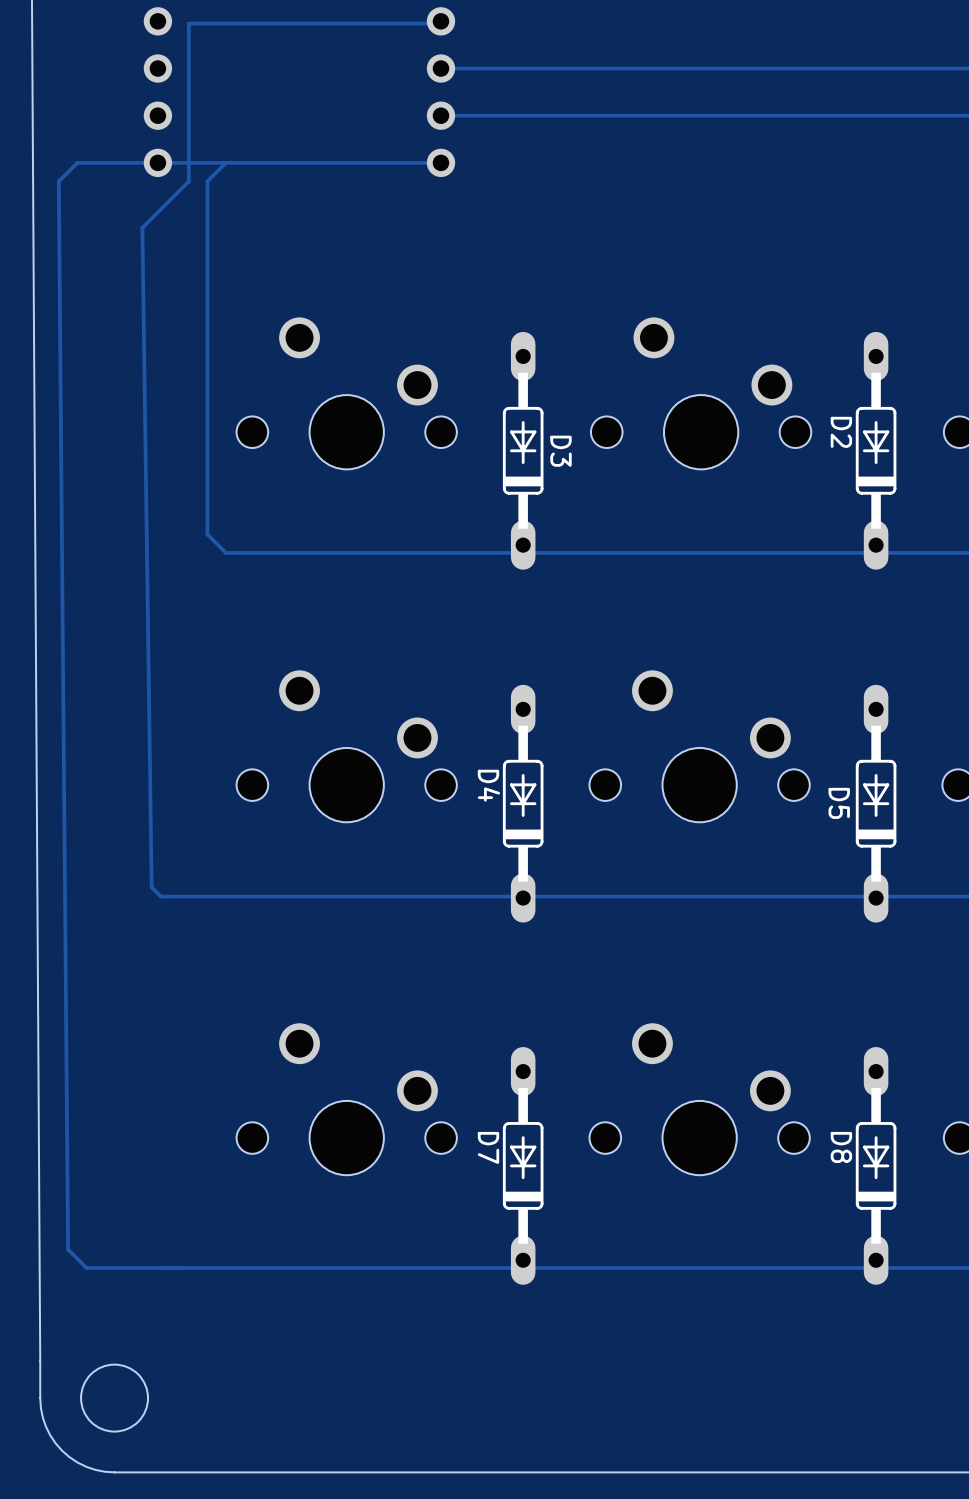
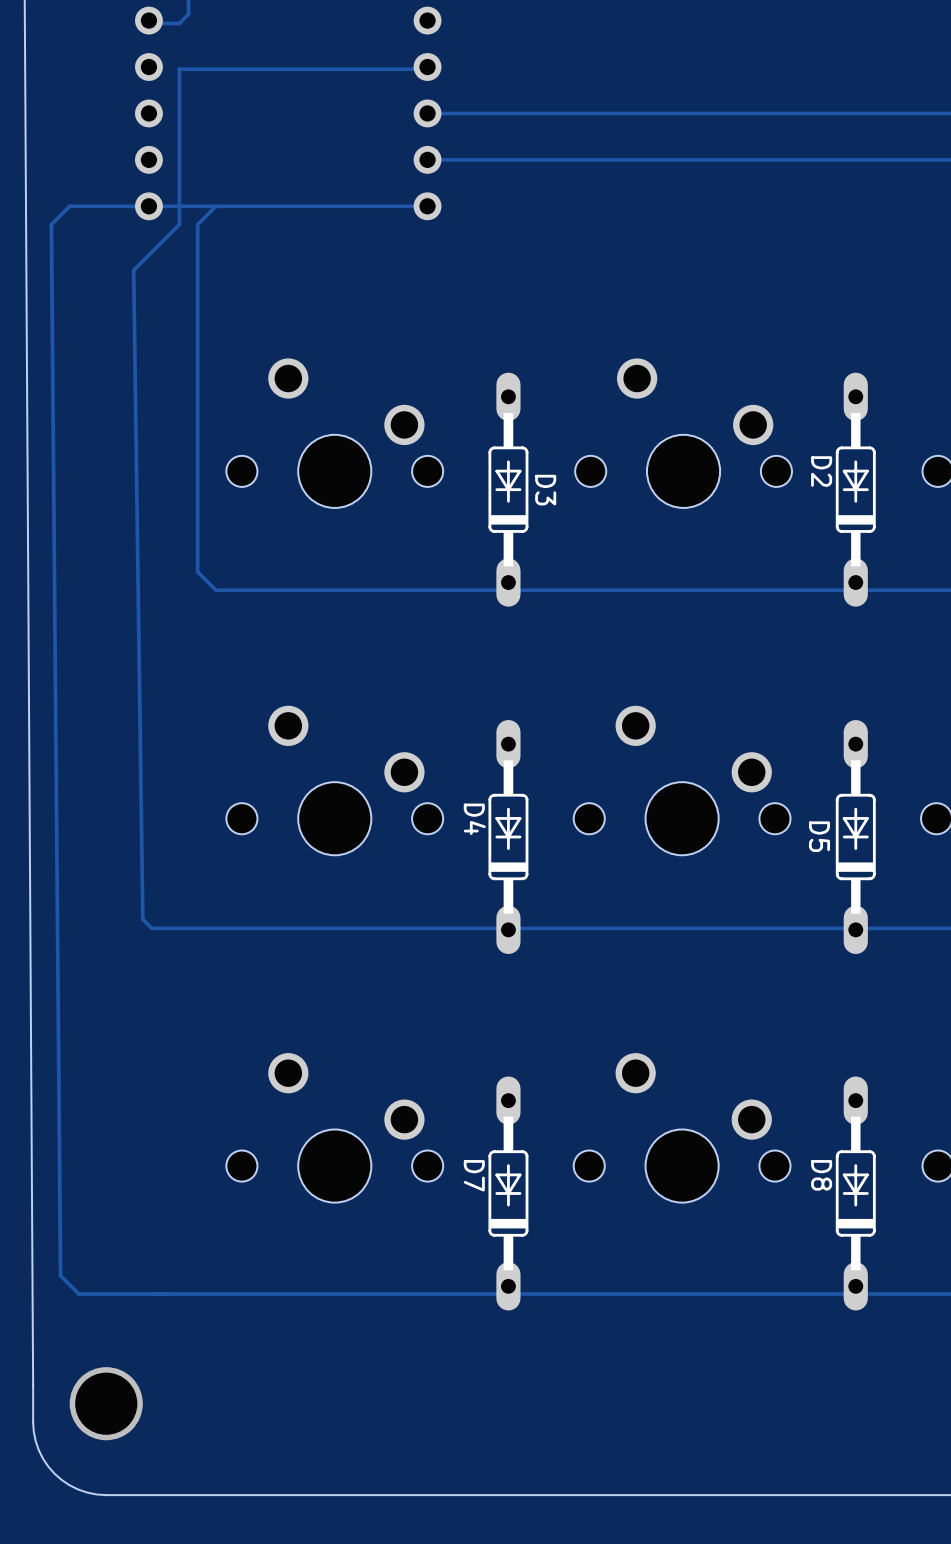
round board edge: [80, 1364, 149, 1433] -> none
via: none -> (106, 1403)

